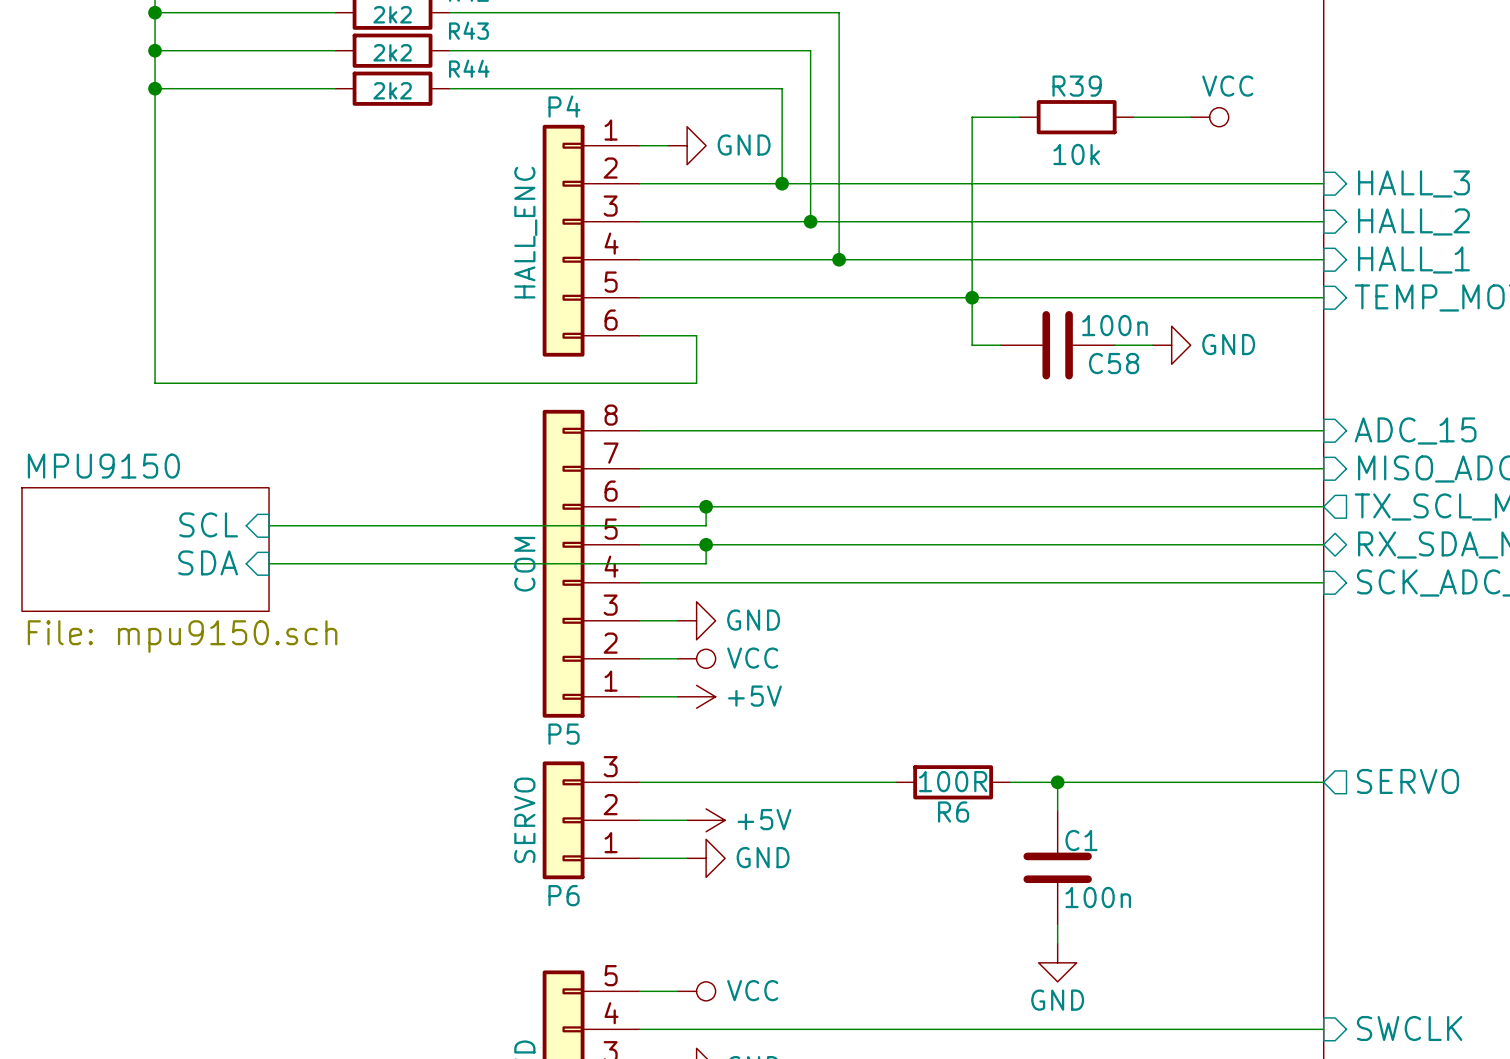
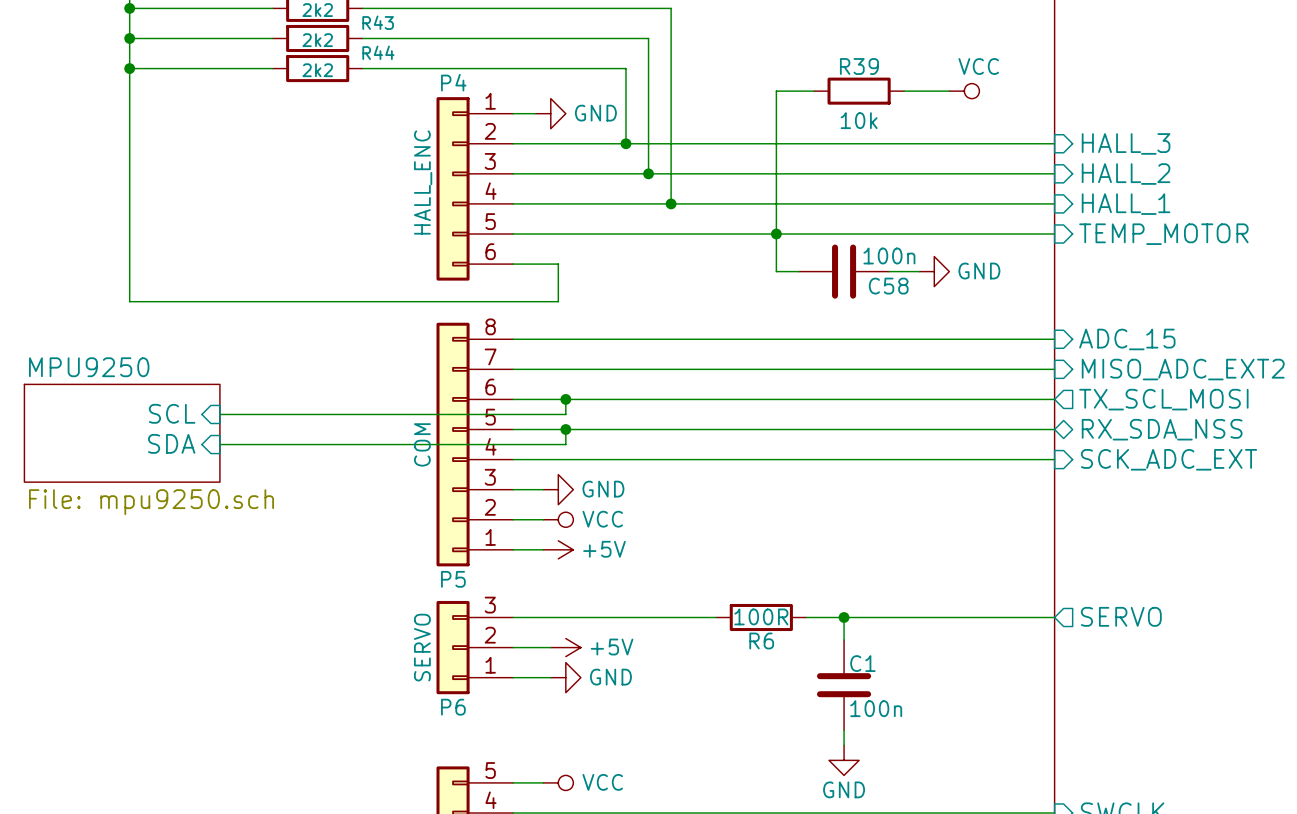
sheet MPU9150 name: MPU9150 (103, 466) -> MPU9250 (89, 367)
sheet MPU9150 value: File: mpu9150.sch (182, 636) -> File: mpu9250.sch (151, 502)

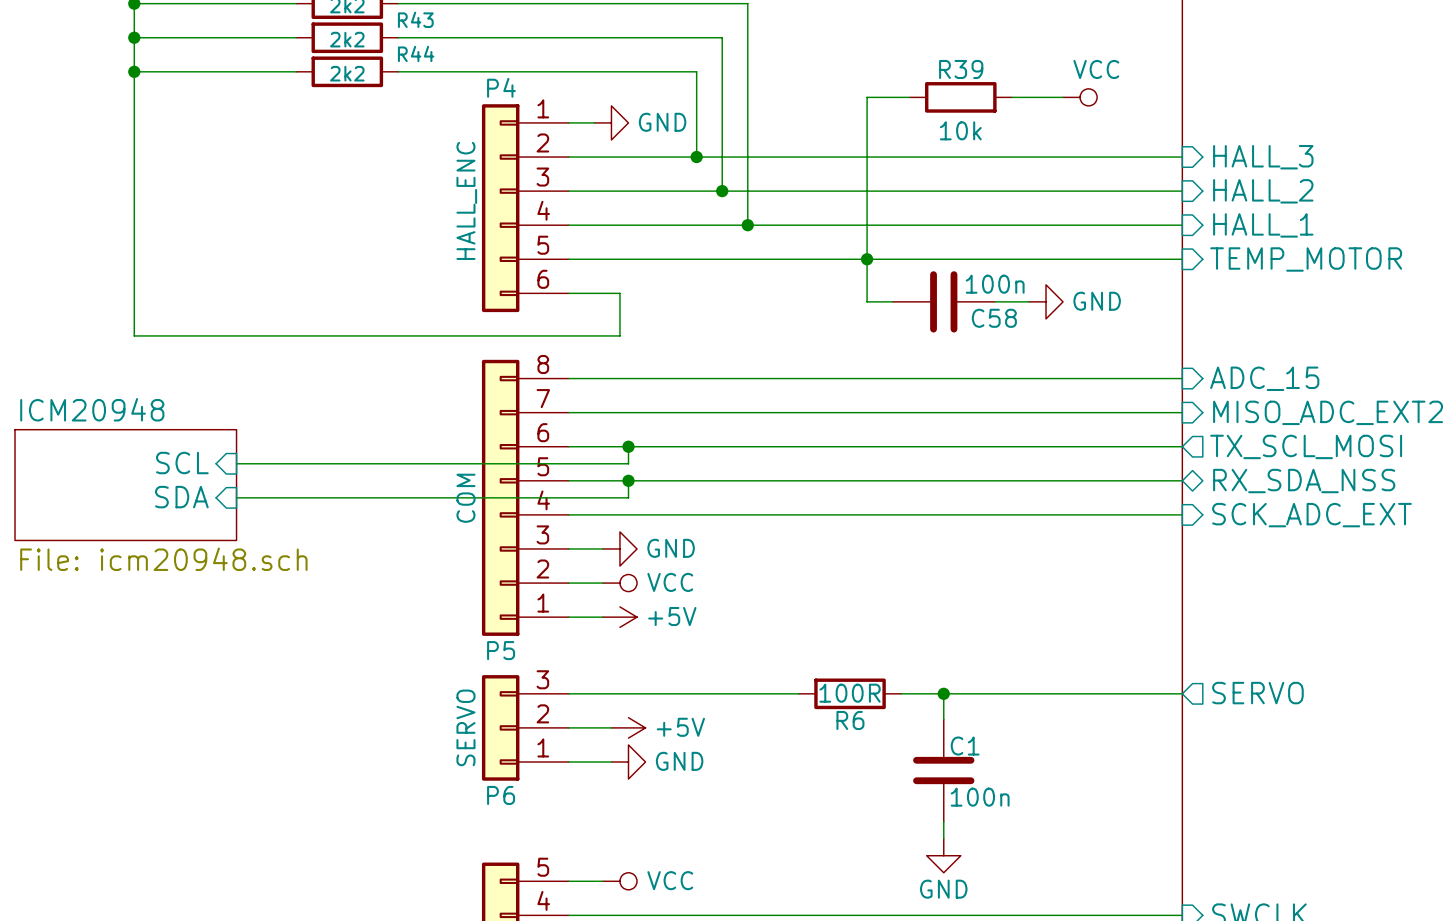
sheet MPU9250 name: MPU9250 (89, 367) -> ICM20948 (92, 409)
sheet MPU9250 value: File: mpu9250.sch (151, 502) -> File: icm20948.sch (163, 559)

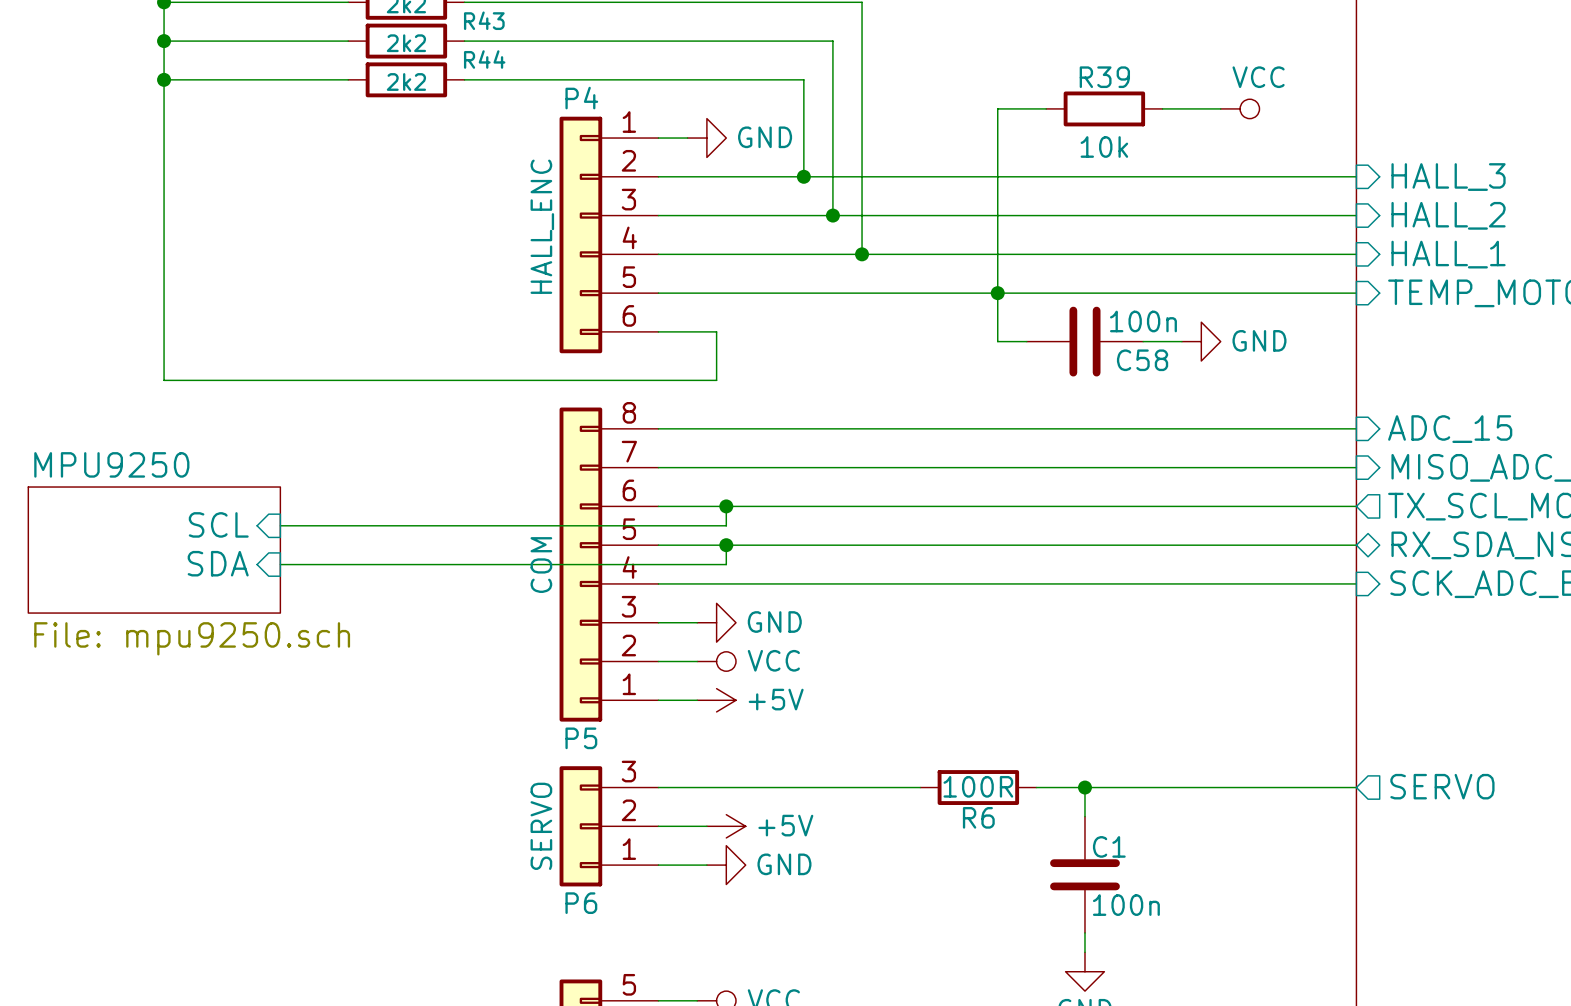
sheet ICM20948 name: ICM20948 (92, 409) -> MPU9250 (111, 464)
sheet ICM20948 value: File: icm20948.sch (163, 559) -> File: mpu9250.sch (192, 638)

